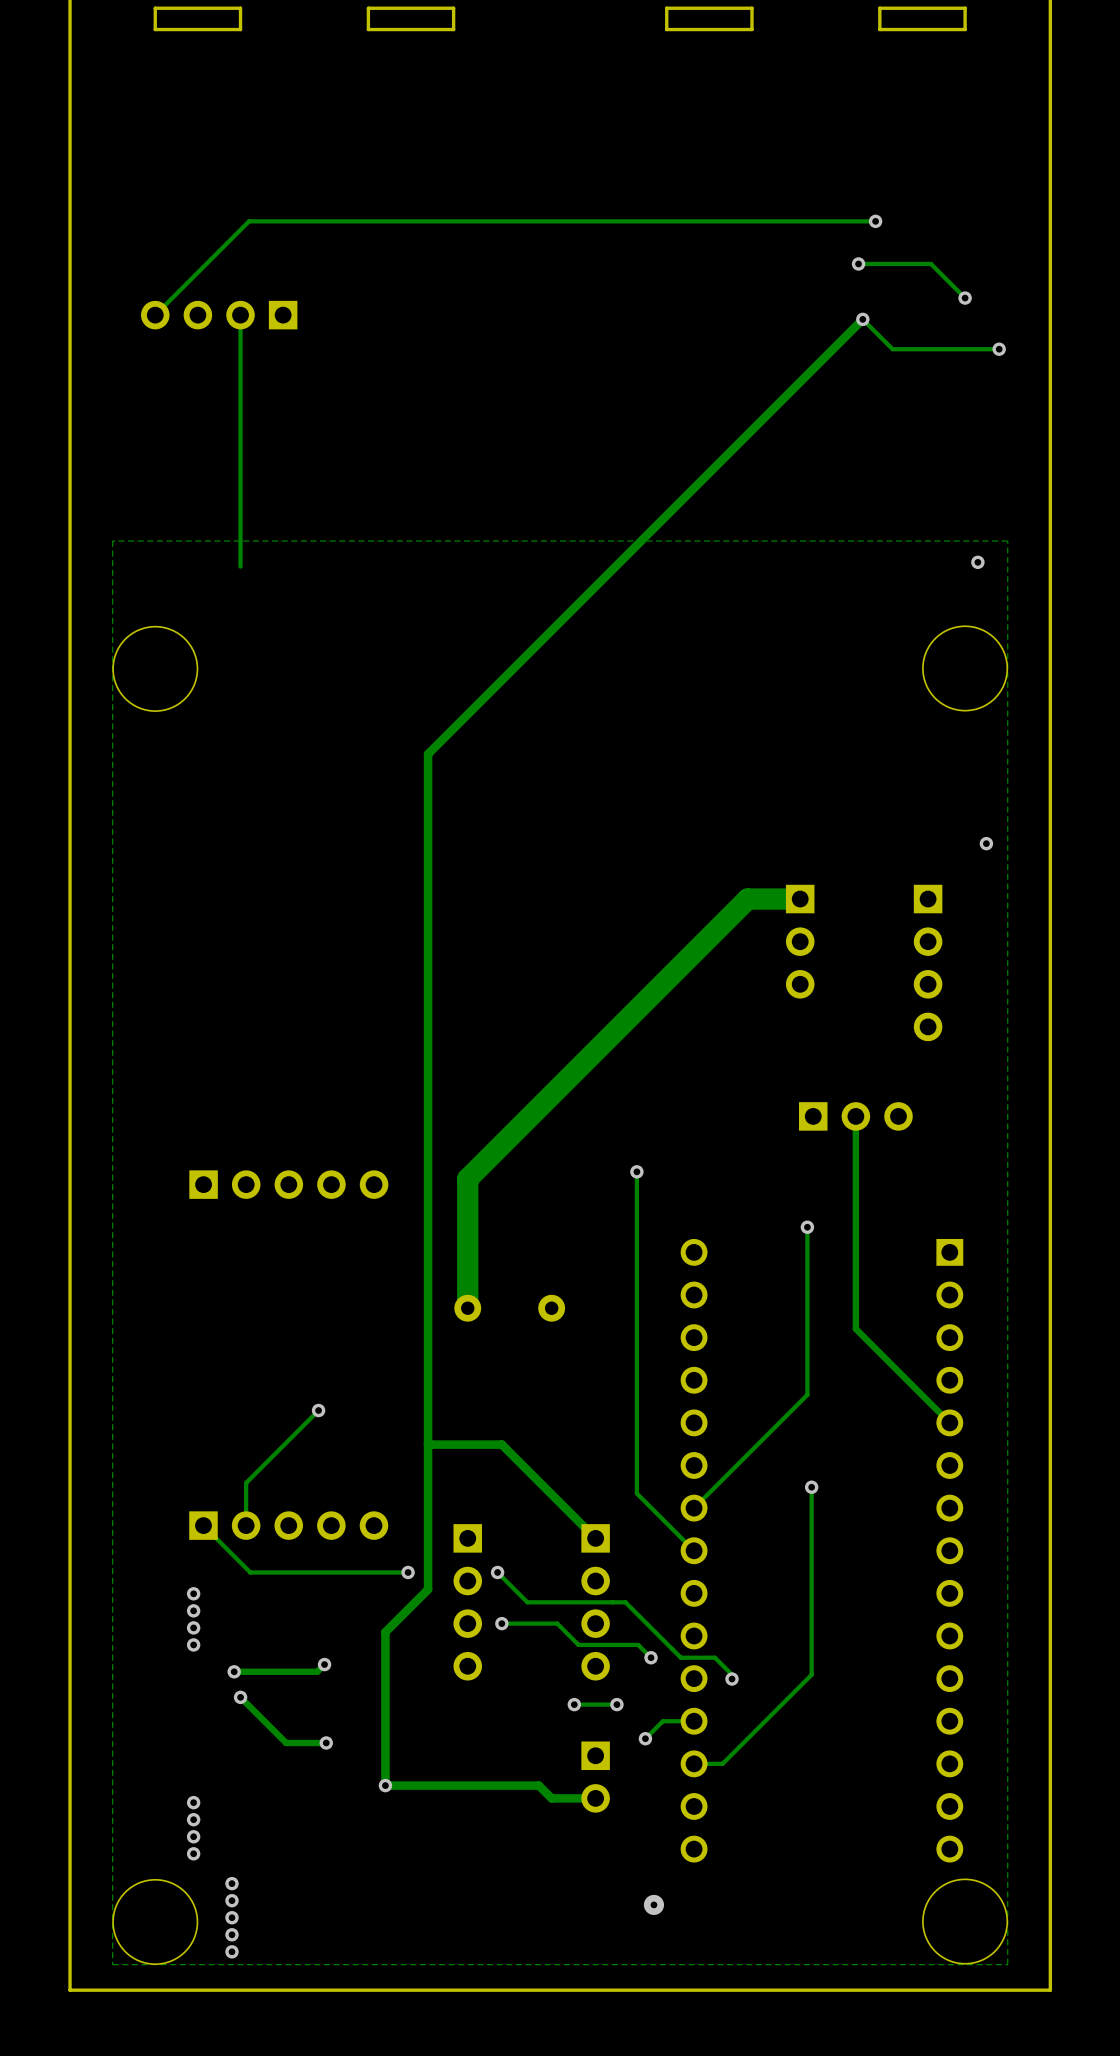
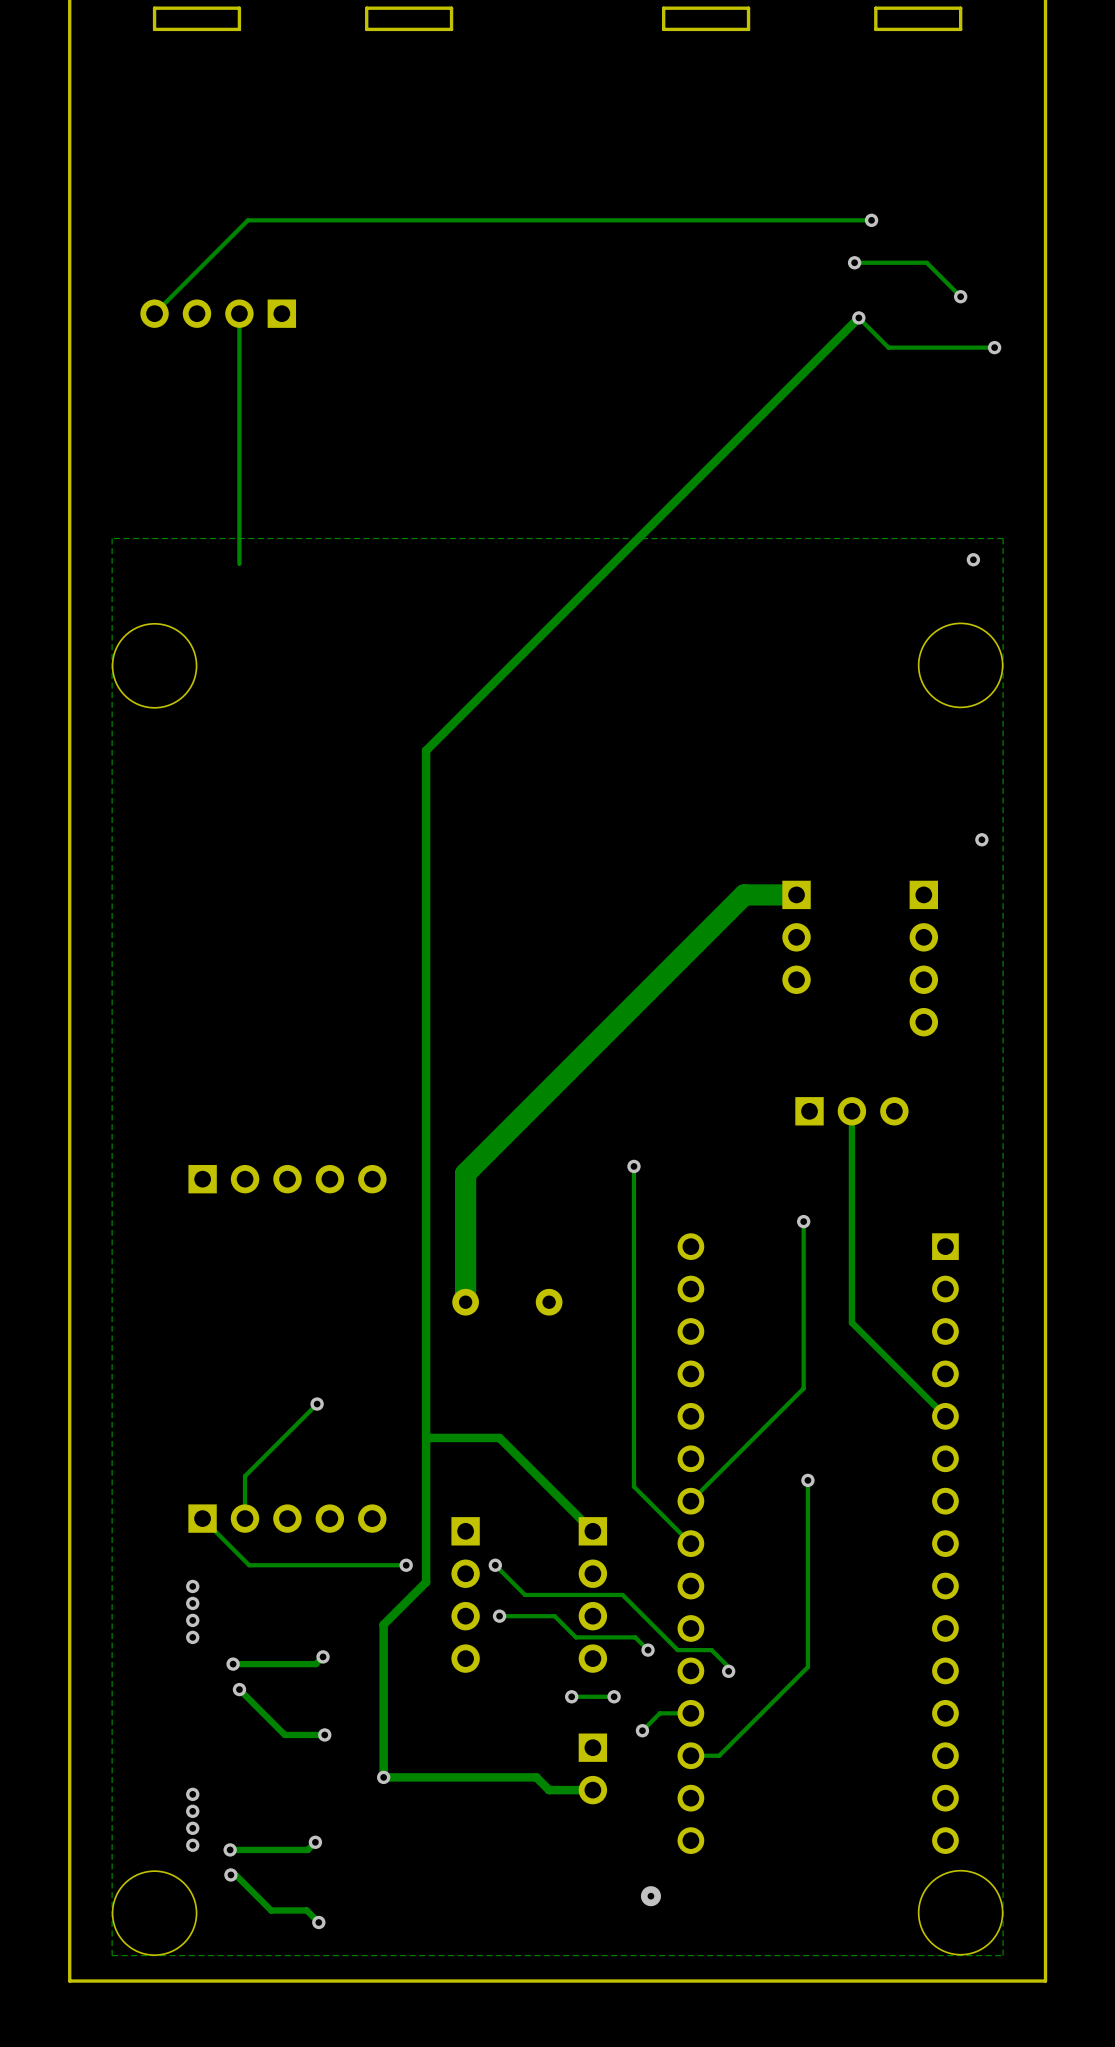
track: none -> (315, 1842) (307, 1849) (230, 1849)
via: none -> (315, 1842)
via: none -> (230, 1849)
track: none -> (233, 1873) (271, 1910) (306, 1910) (318, 1922)
via: (231, 1900) -> none
via: (231, 1917) -> none
via: none -> (318, 1922)
via: (231, 1934) -> none
via: (231, 1951) -> none

